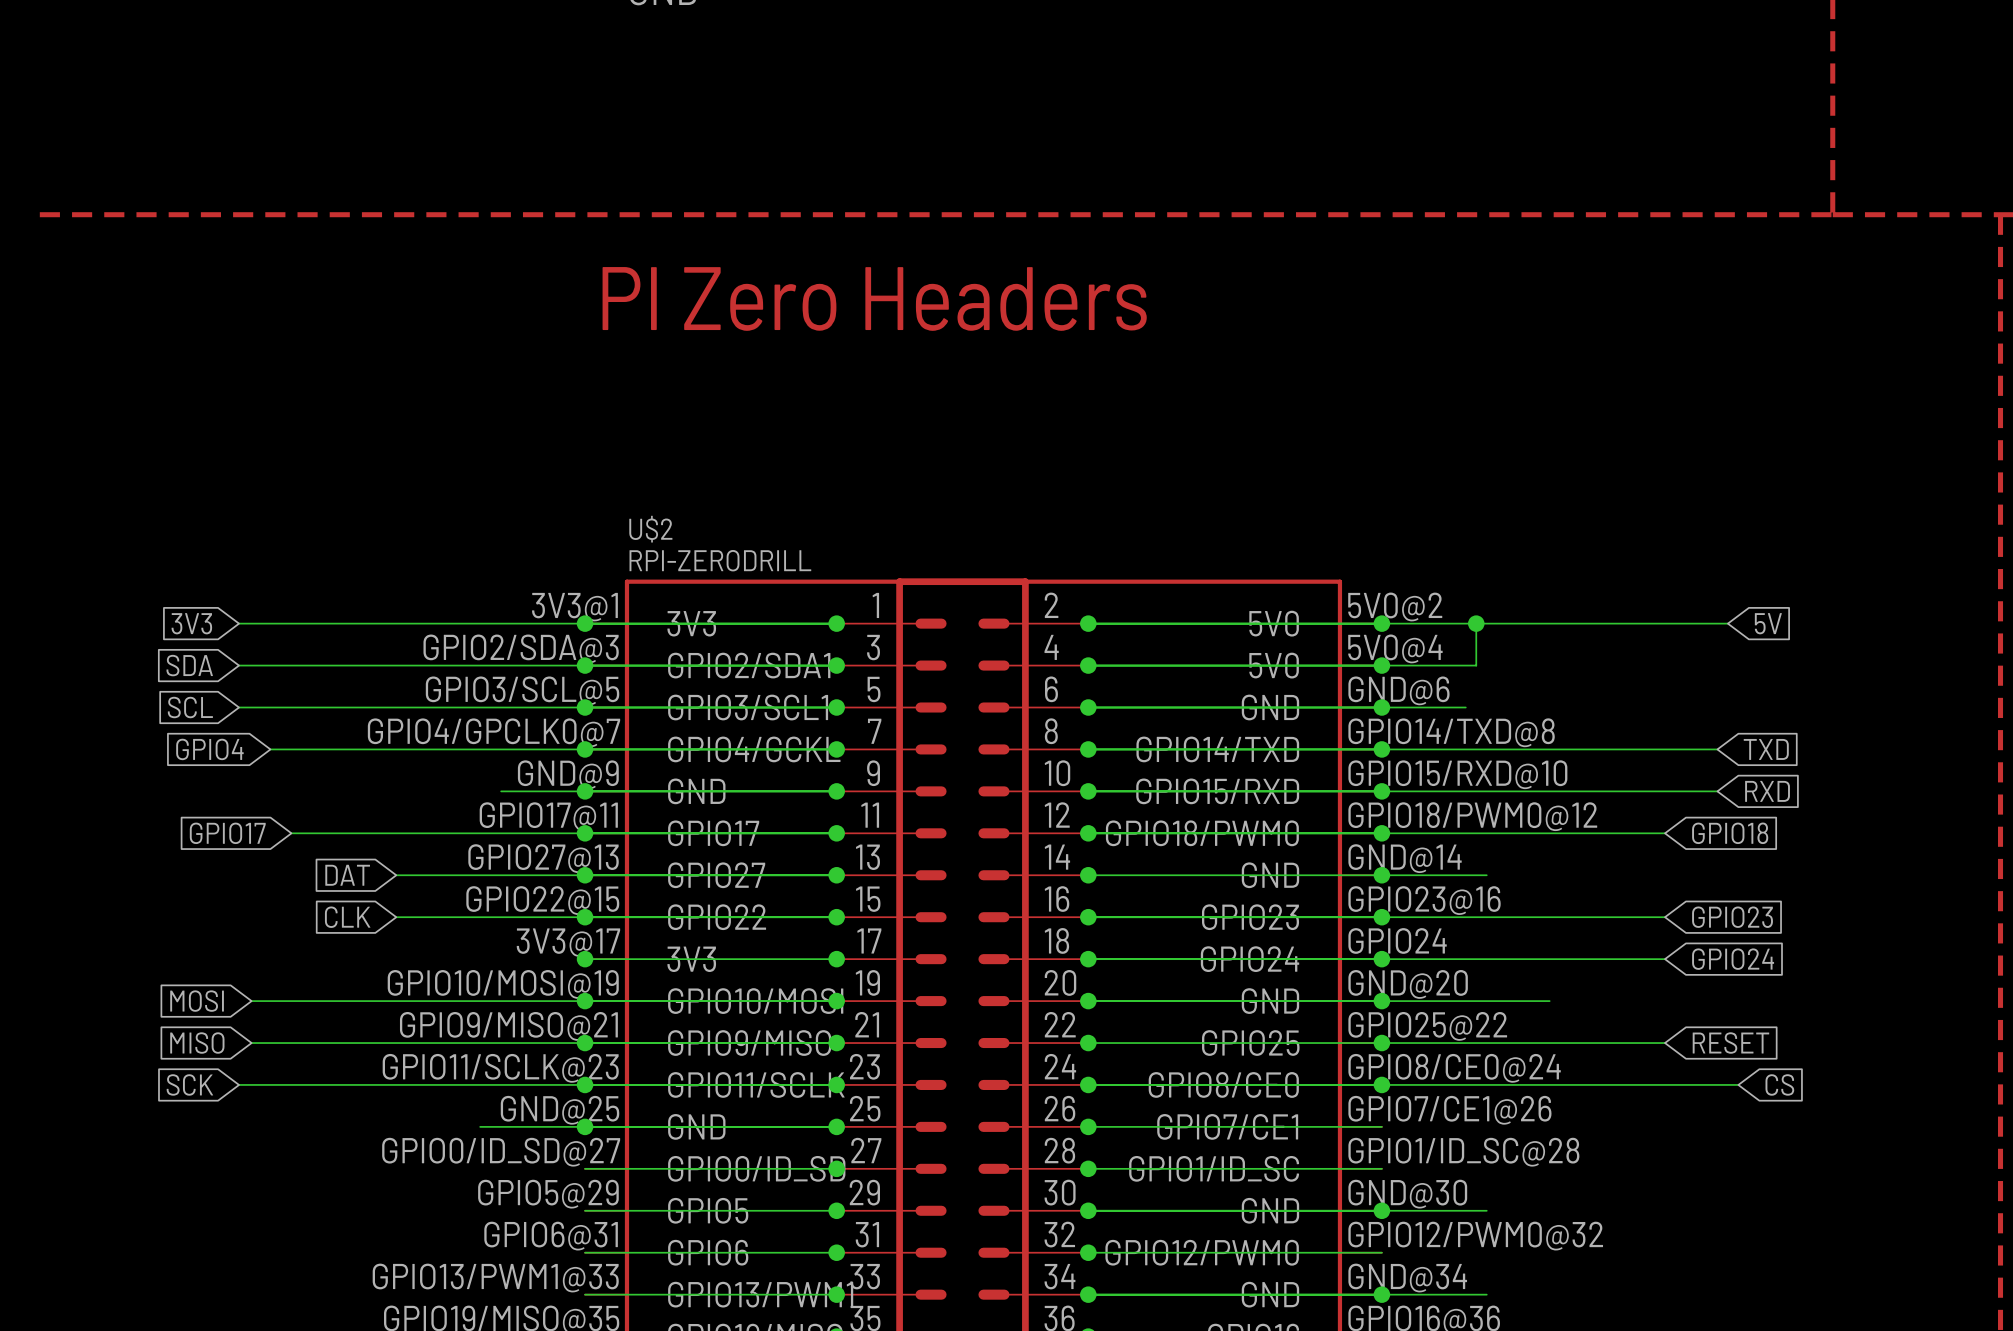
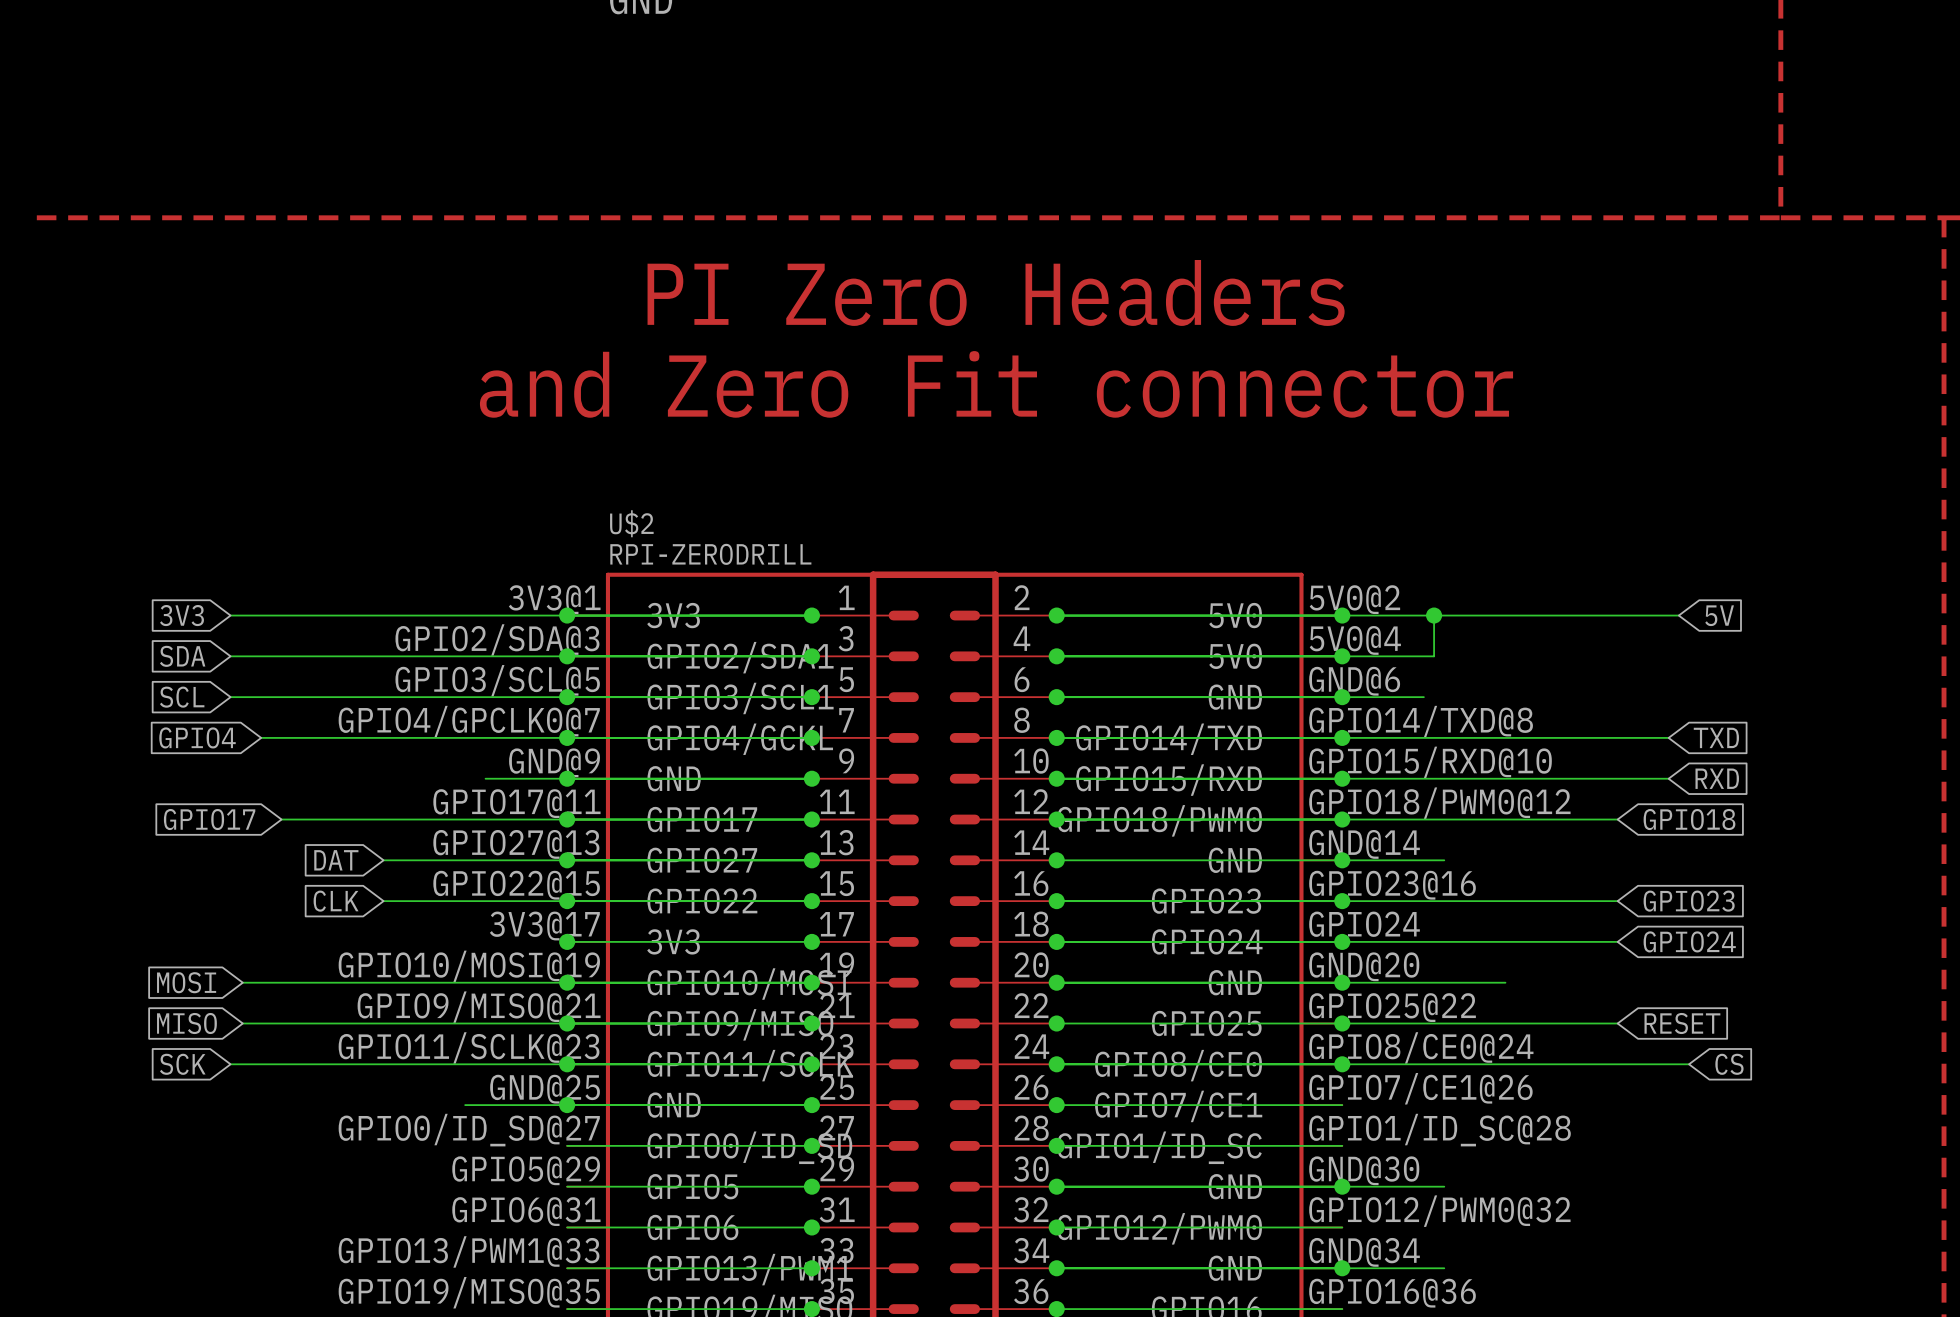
text: none -> PI Zero Headers (996, 292)
text: PI Zero Headers (874, 298) -> none
text: none -> and Zero Fit connector (996, 384)

